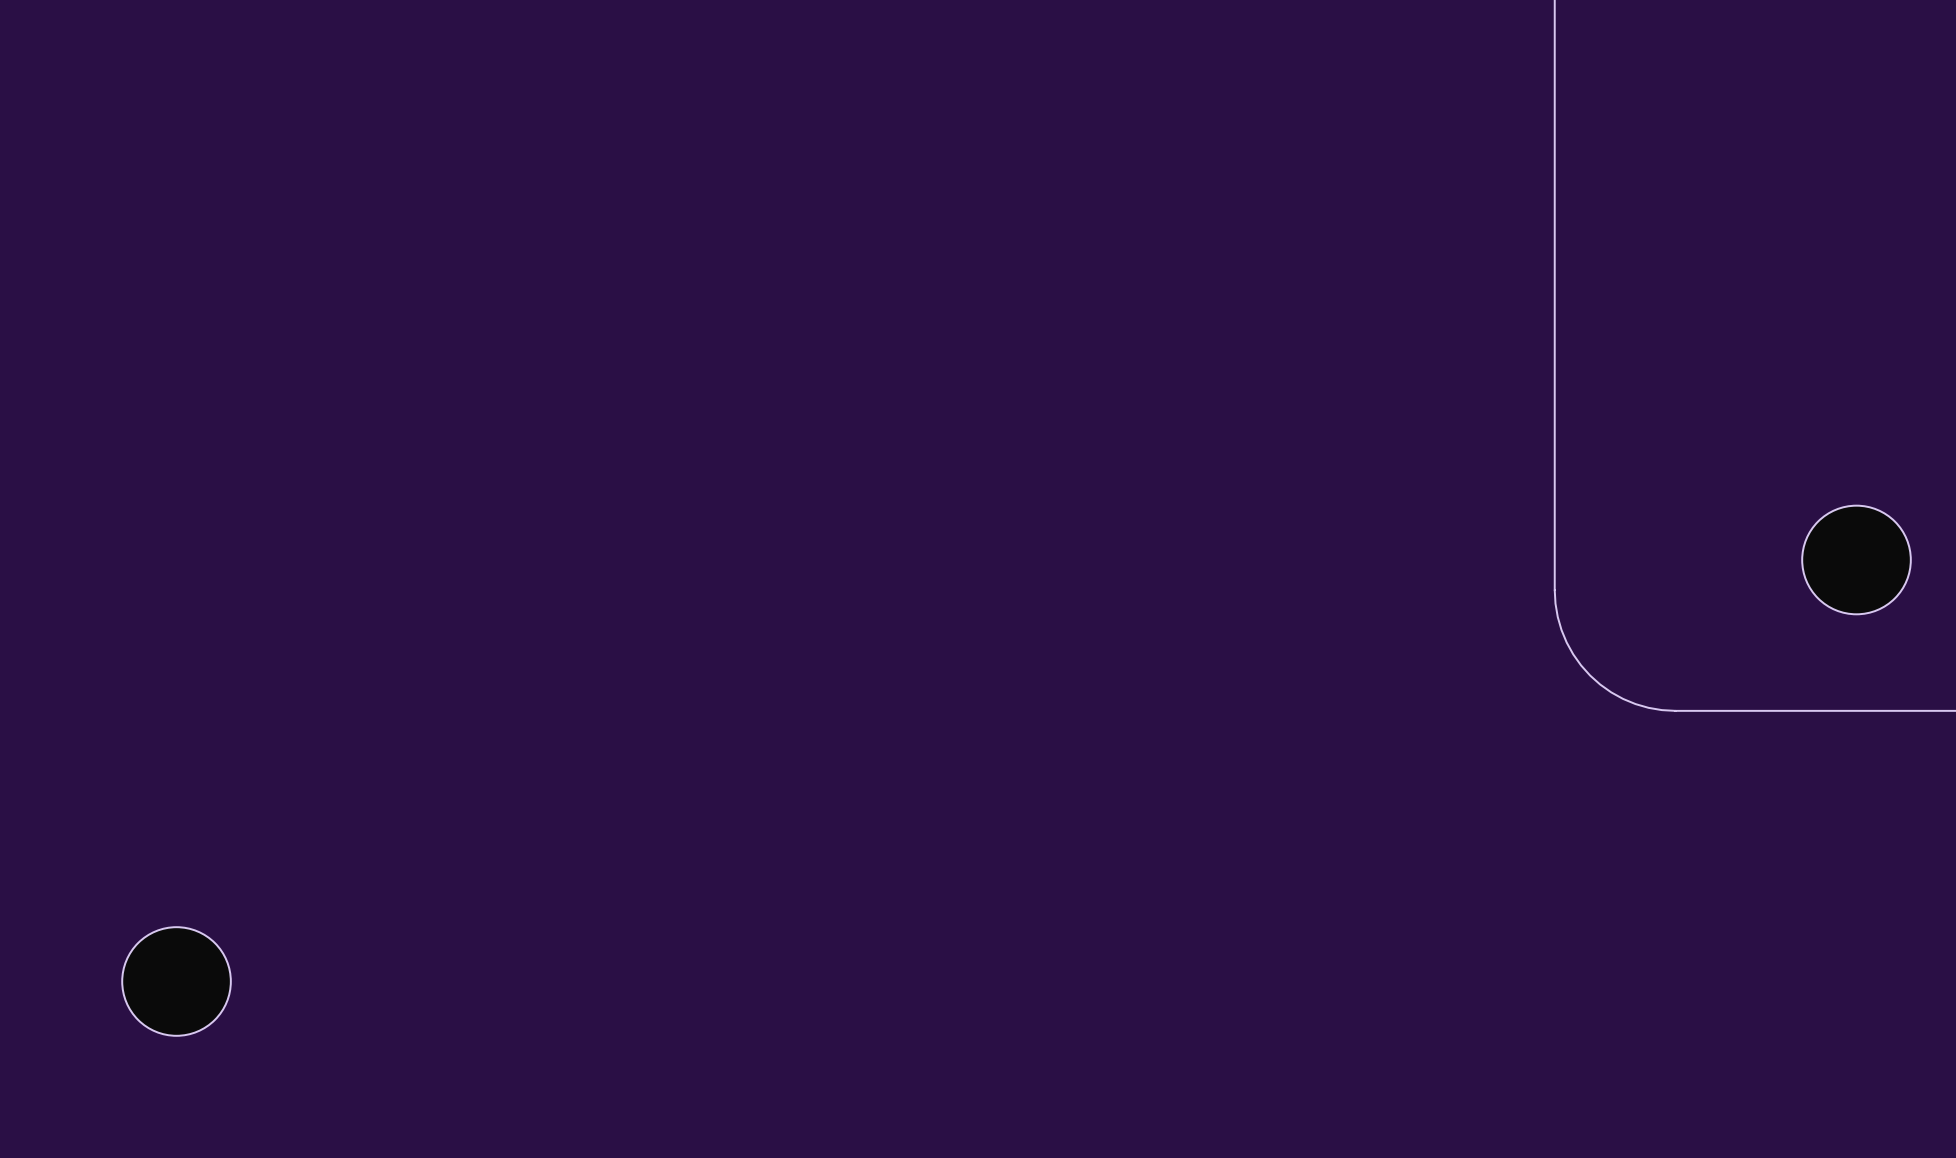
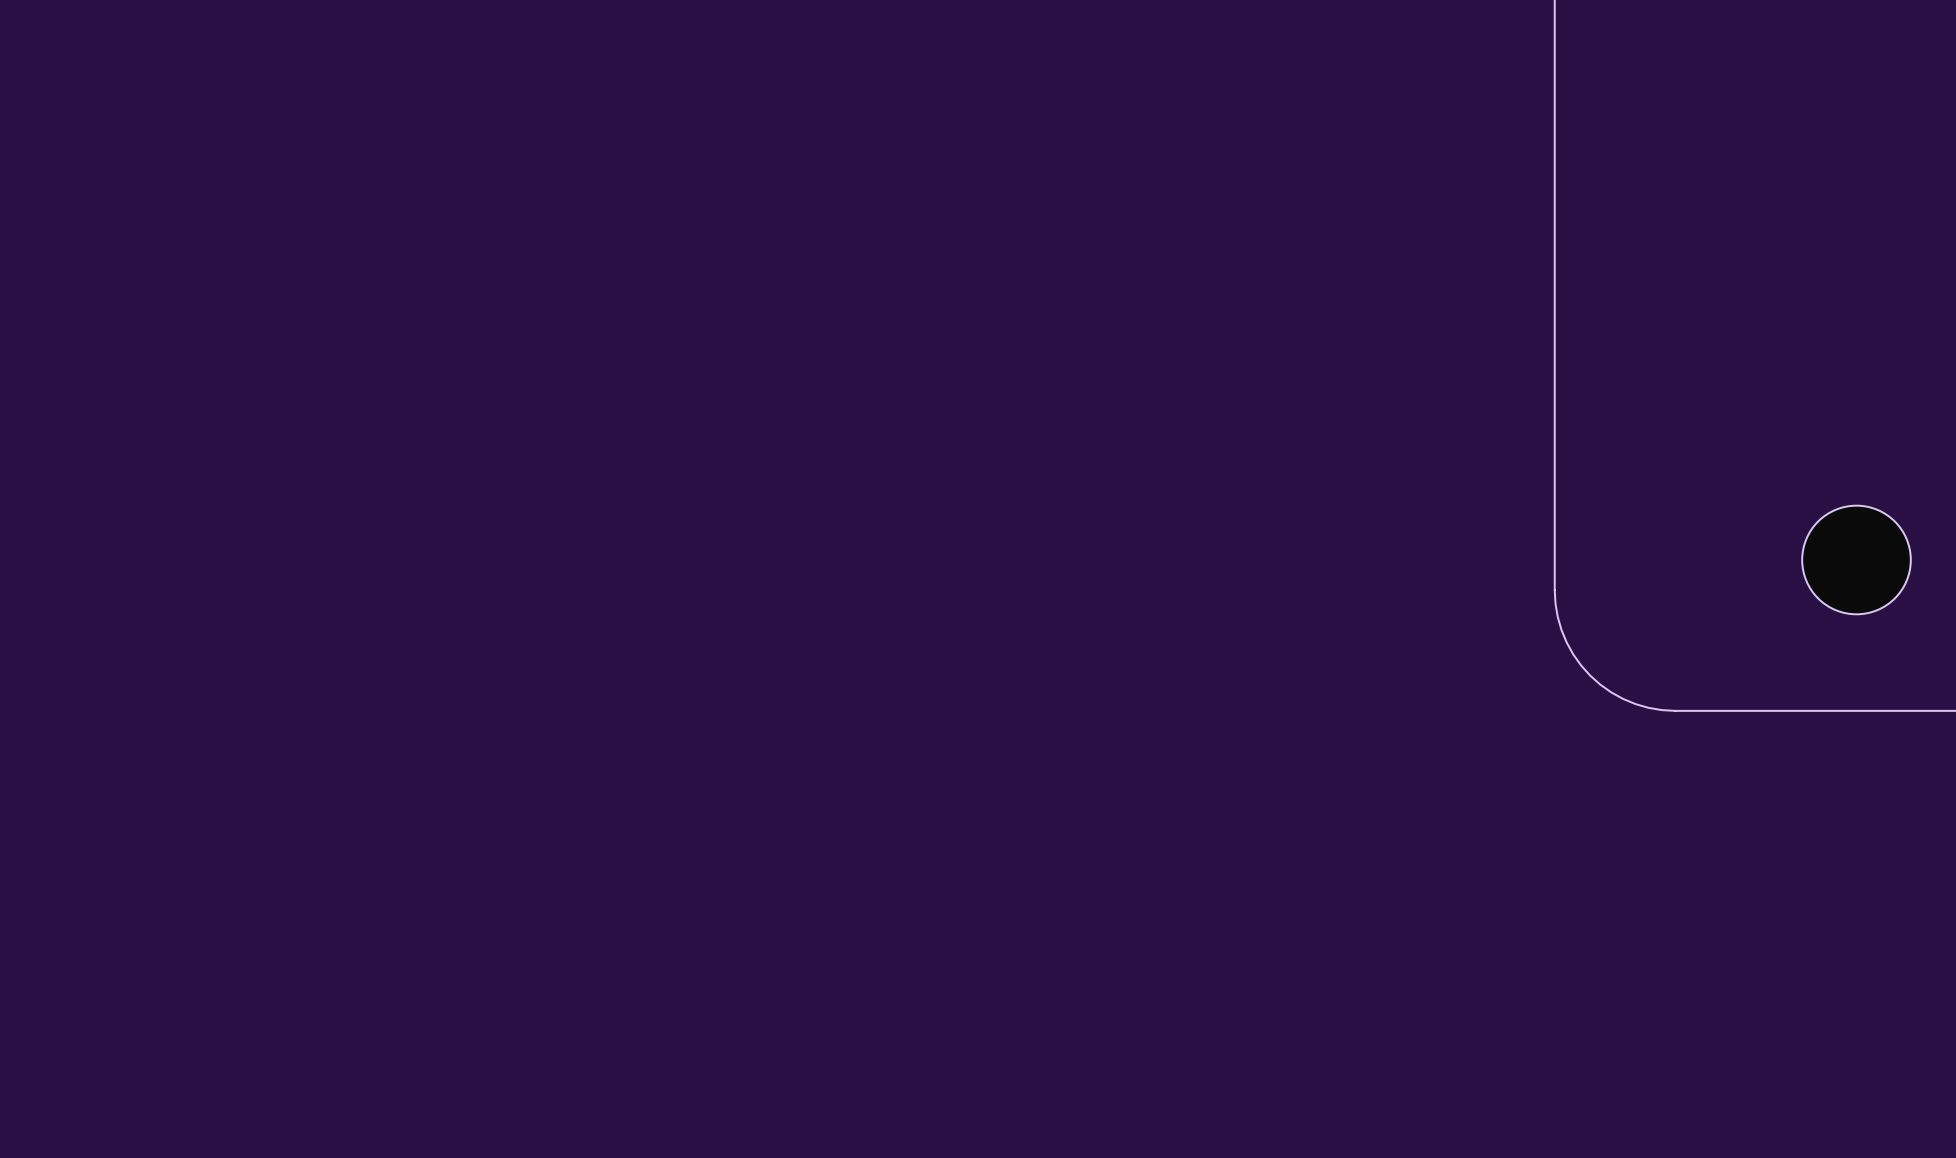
part: (176, 981) -> none

